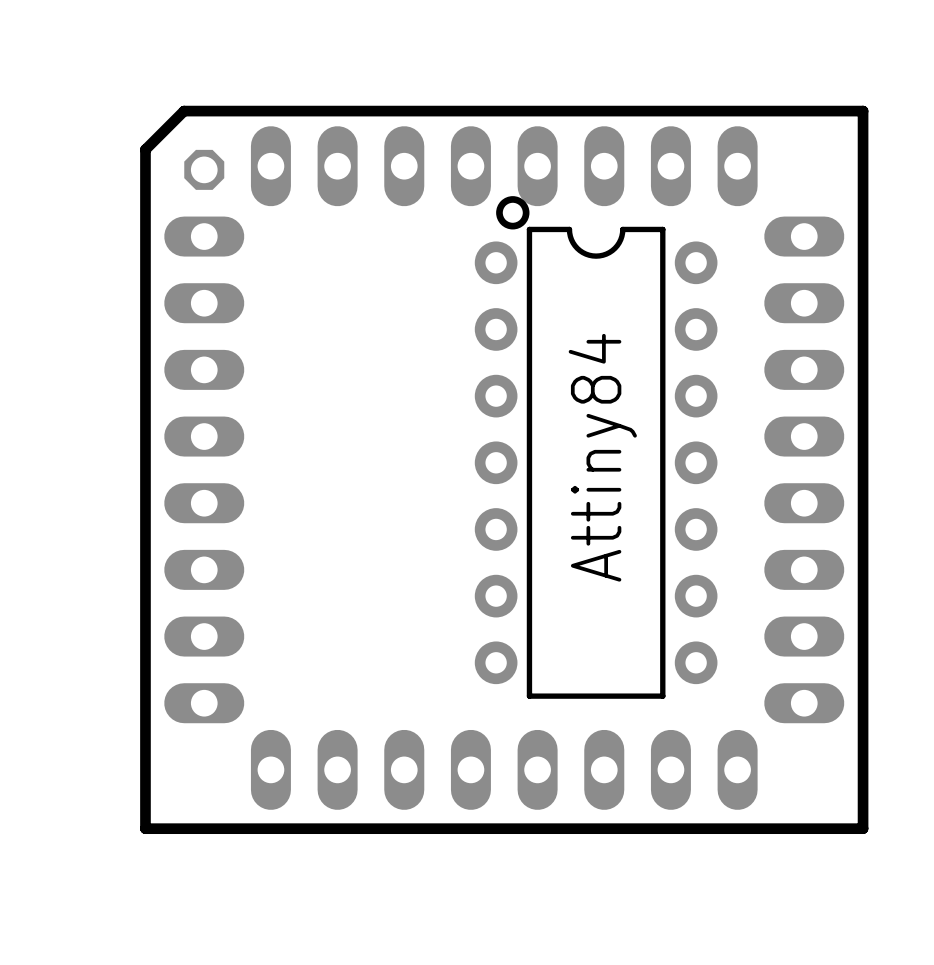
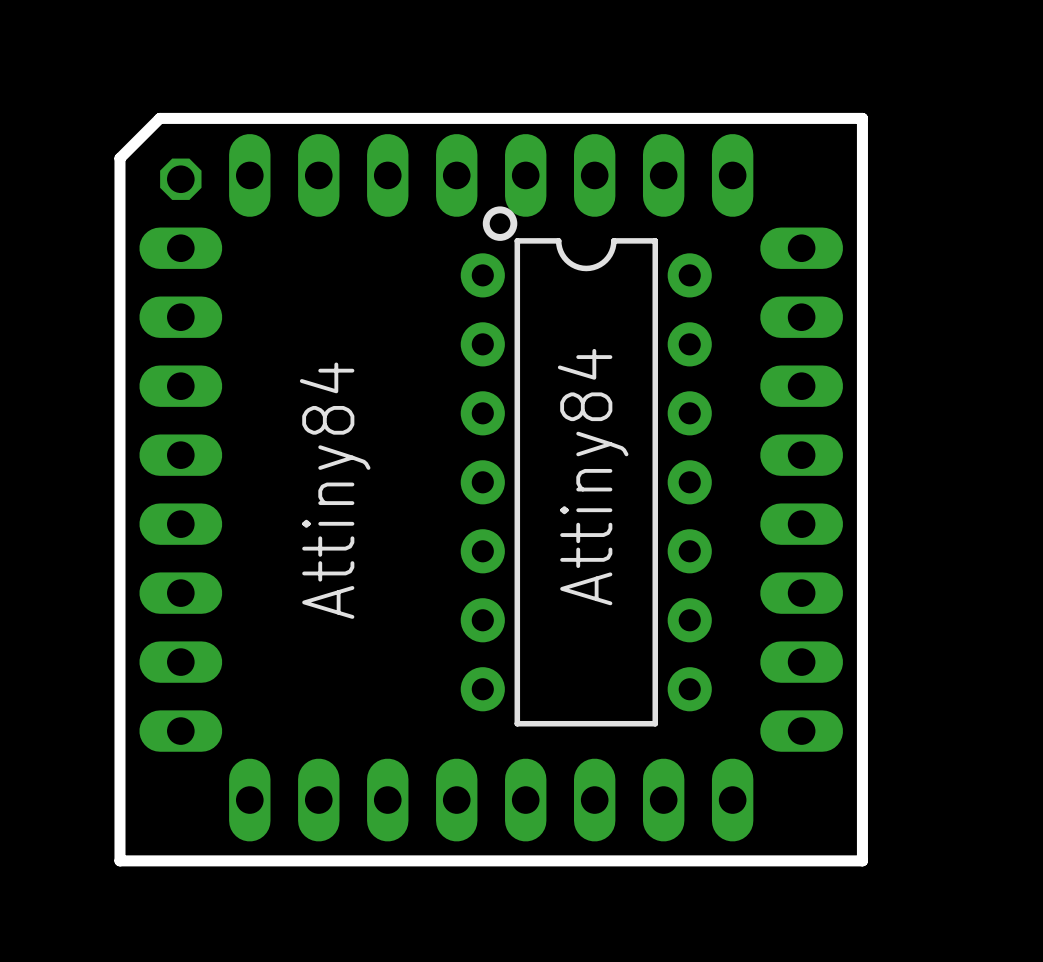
text: none -> Attiny84 (335, 490)

